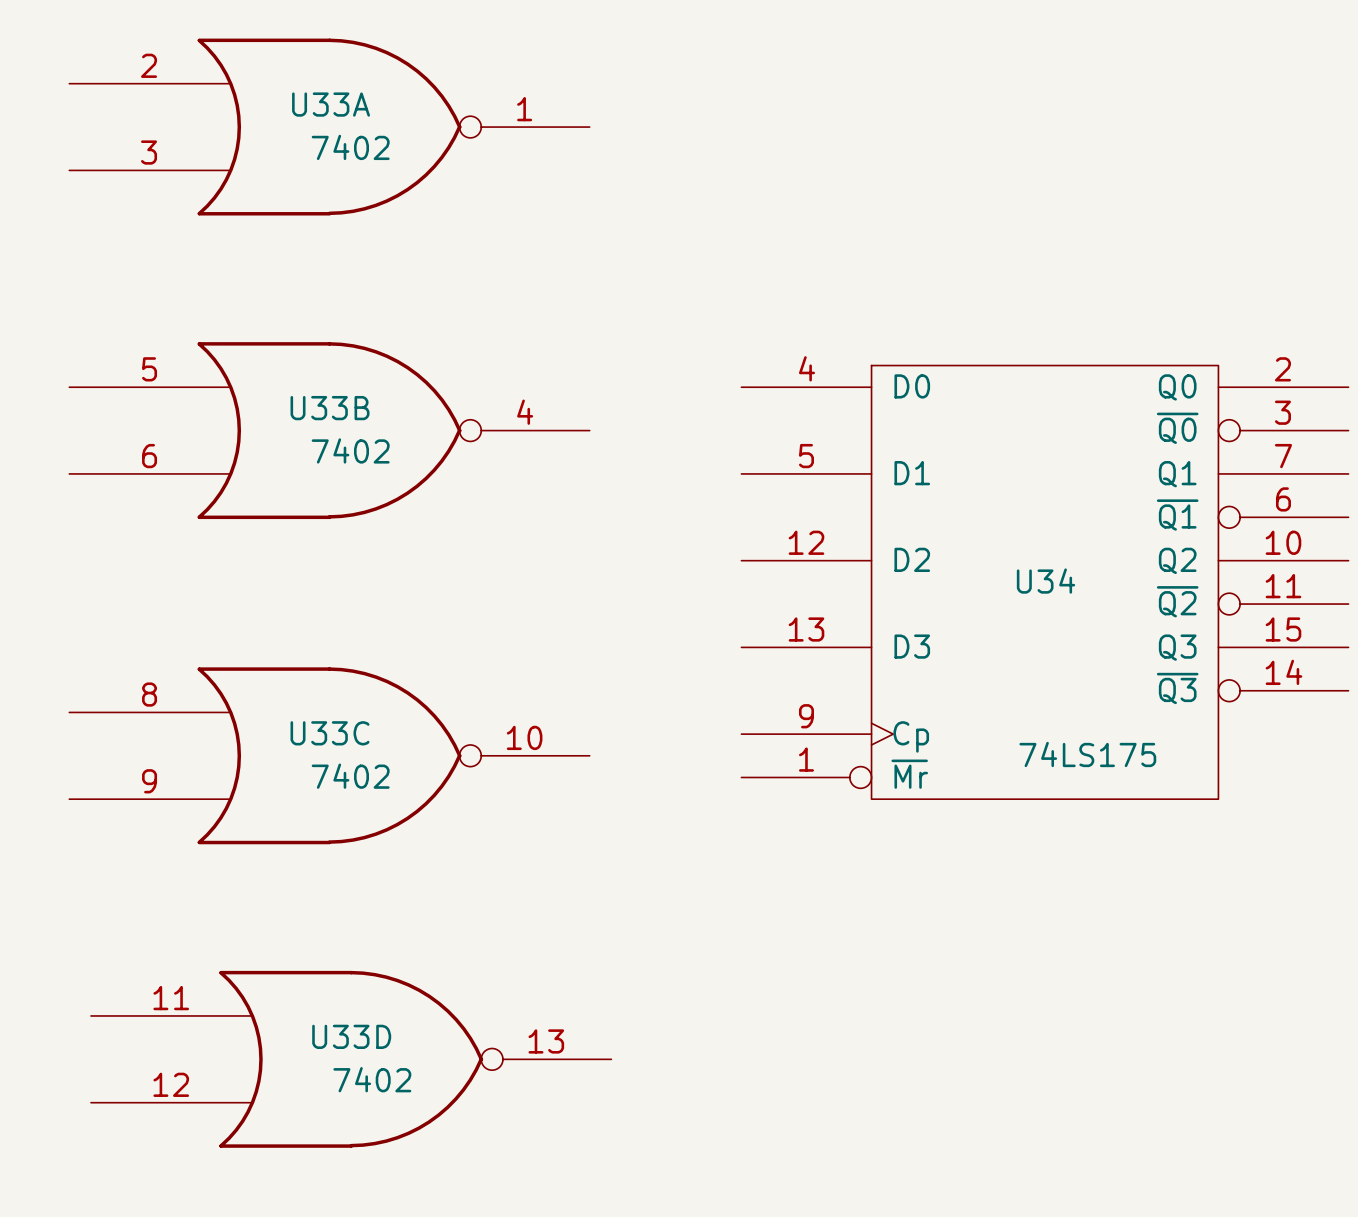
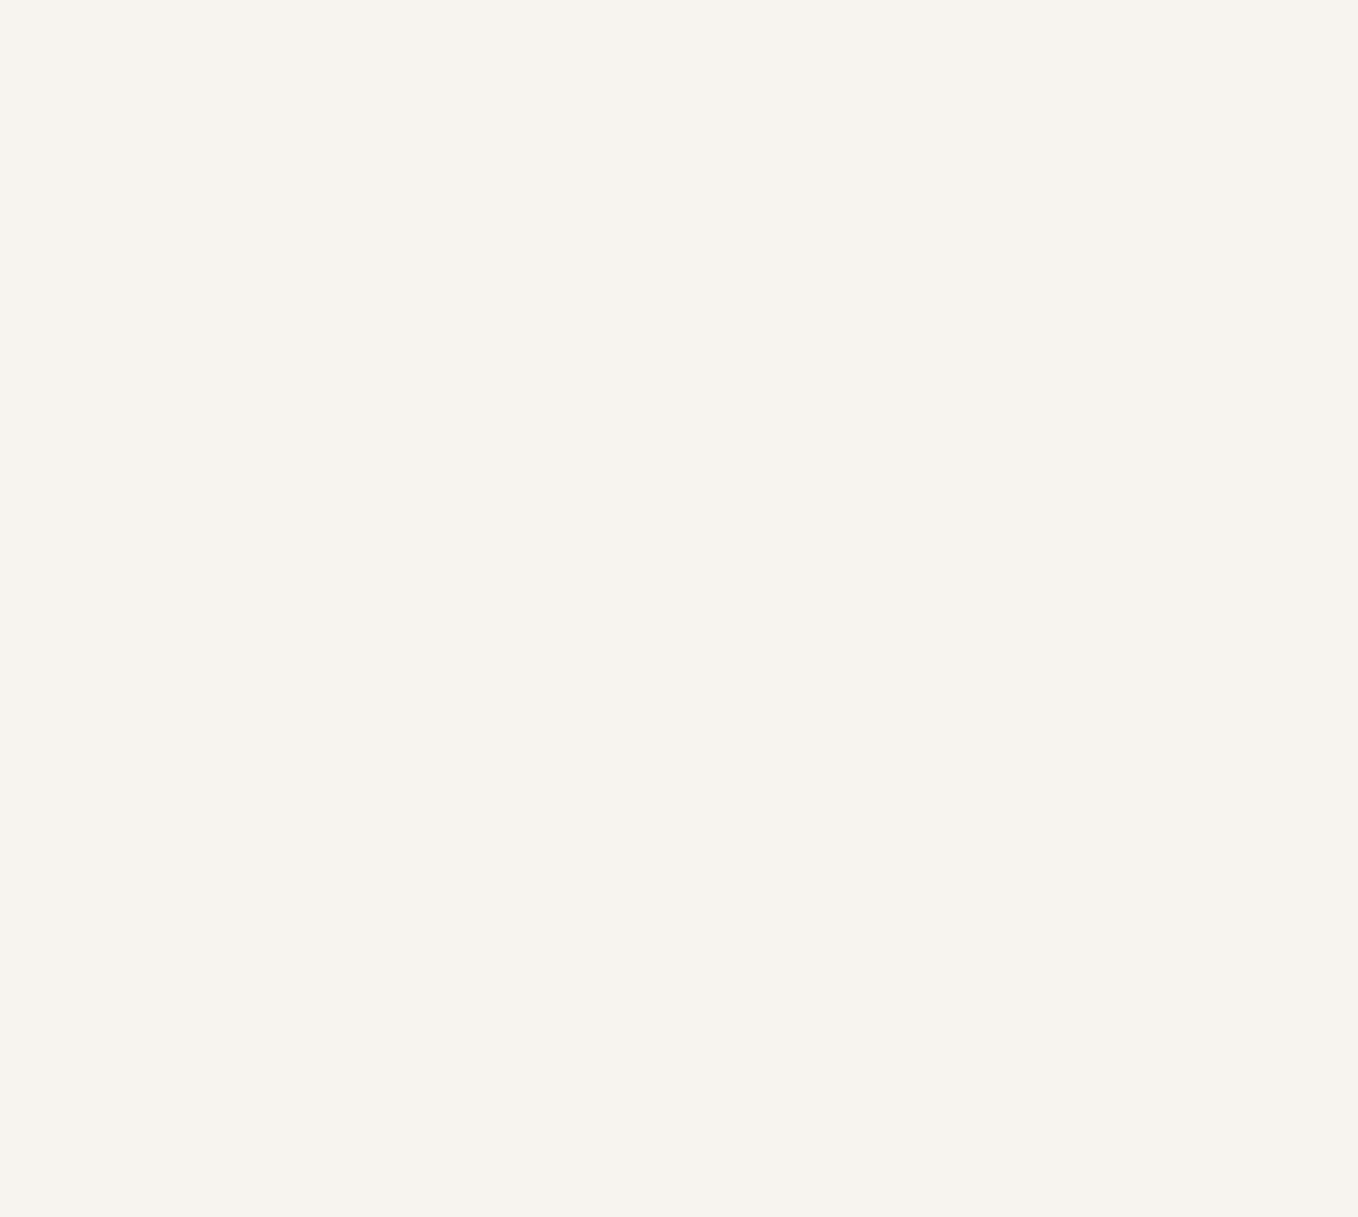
U33A: 7402 (329, 127) -> none
U33B: 7402 (329, 430) -> none
U34: 74LS175 (1044, 582) -> none
U33C: 7402 (329, 755) -> none
U33D: 7402 (351, 1059) -> none

